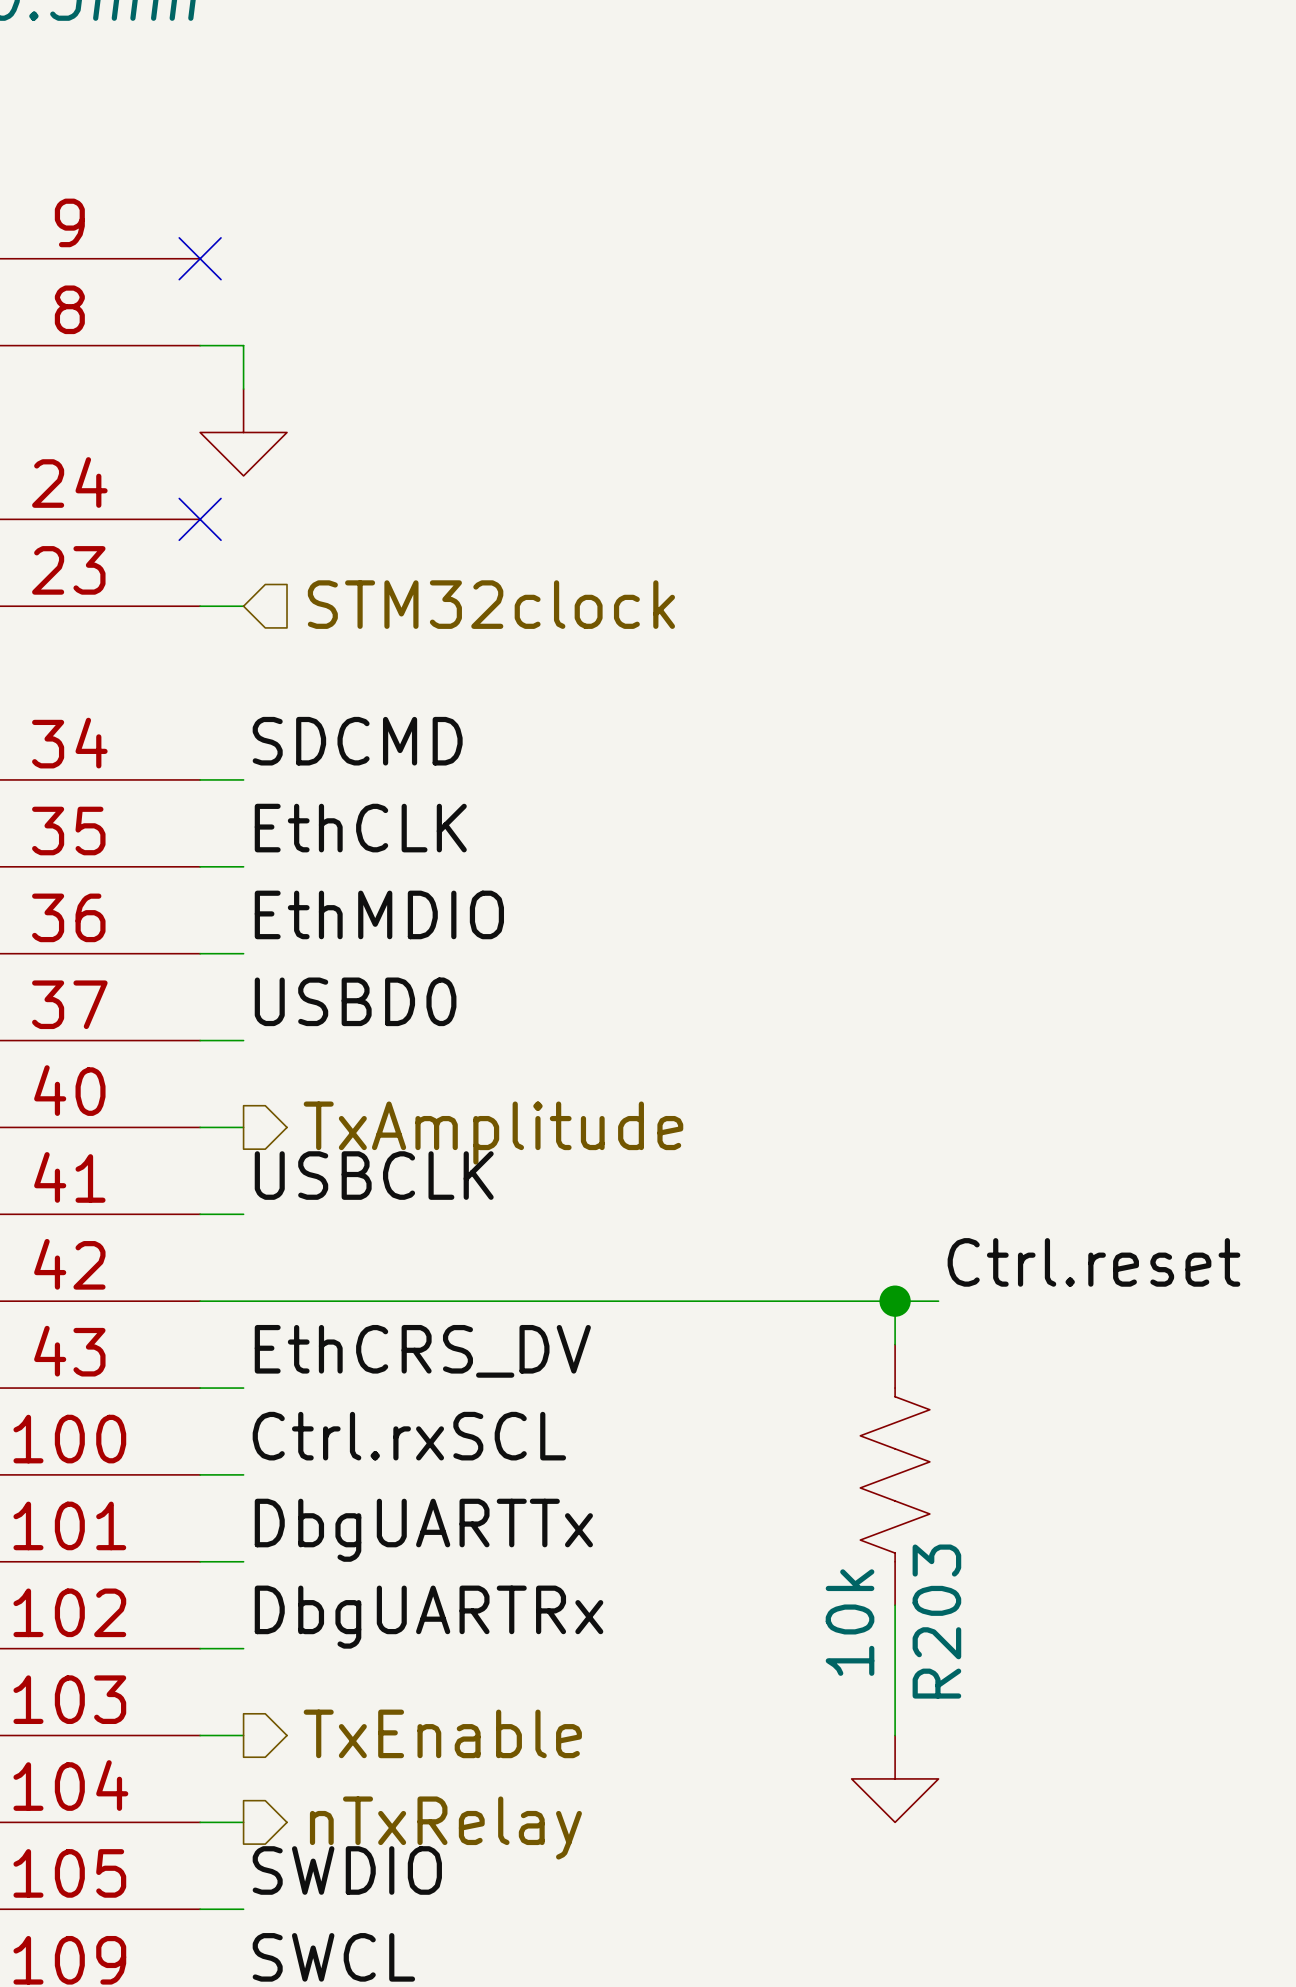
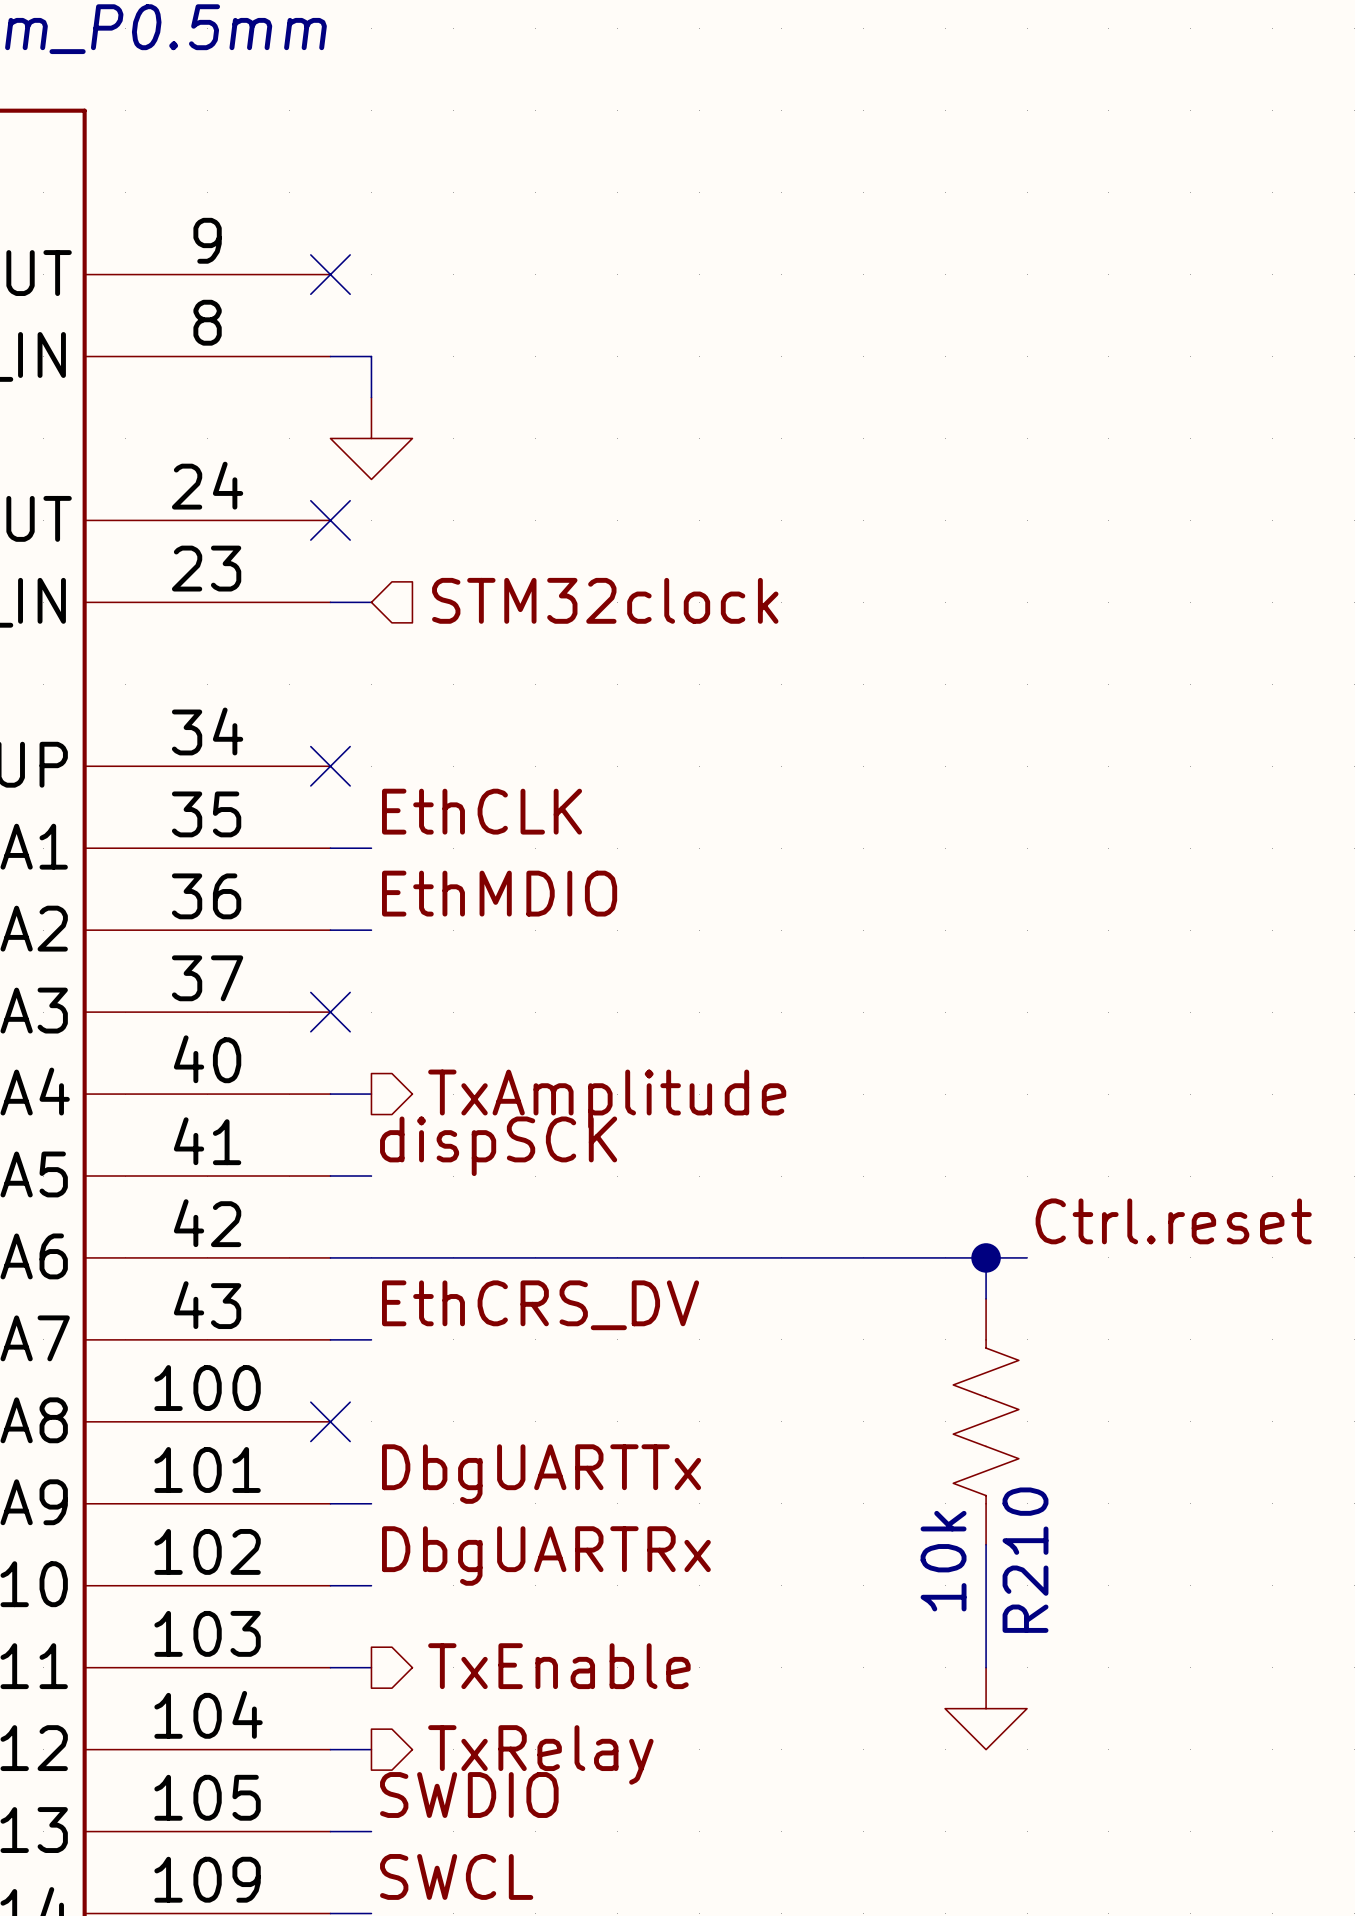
label: SDCMD (357, 741) -> none
wire: (200, 779) (243, 779) -> none
no-connect mark: none -> (330, 766)
label: USBD0 (355, 1001) -> none
wire: (200, 1040) (243, 1040) -> none
no-connect mark: none -> (330, 1012)
label: USBCLK (374, 1175) -> dispSCK (498, 1146)
label: Ctrl.rxSCL (409, 1436) -> none
wire: (200, 1474) (243, 1474) -> none
no-connect mark: none -> (330, 1421)
R203 name: R203 (936, 1621) -> R210 (1025, 1560)
hierarchical label: nTxRelay (445, 1827) -> TxRelay (540, 1754)

